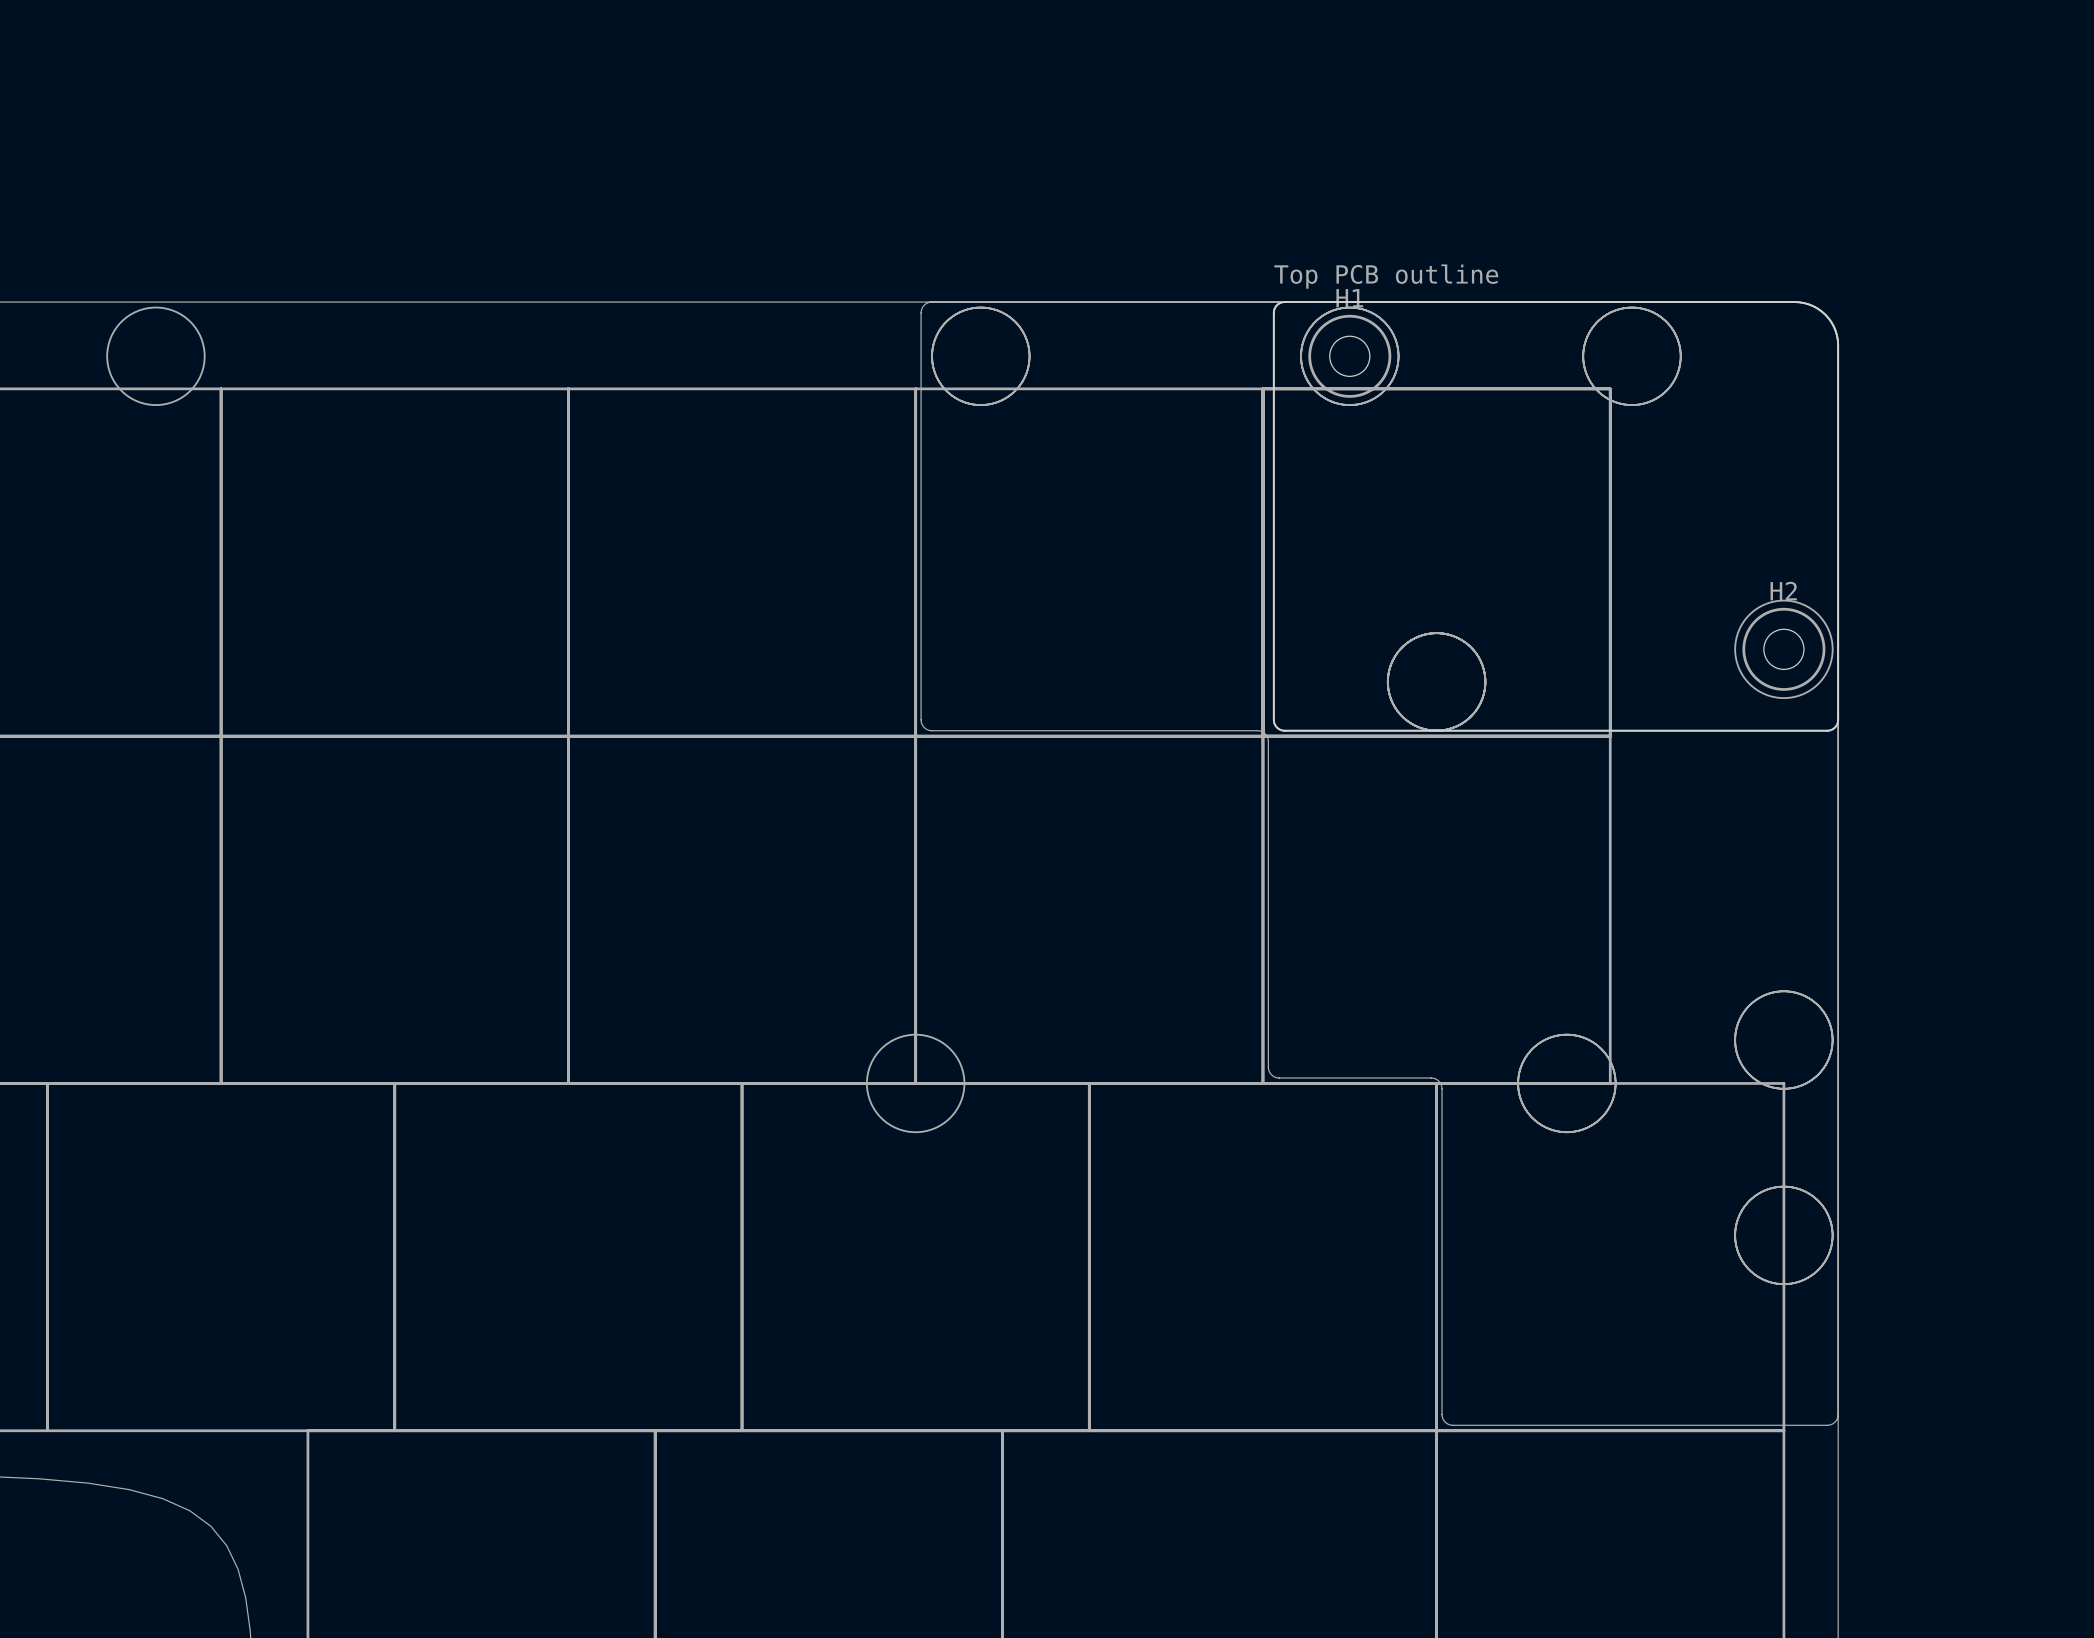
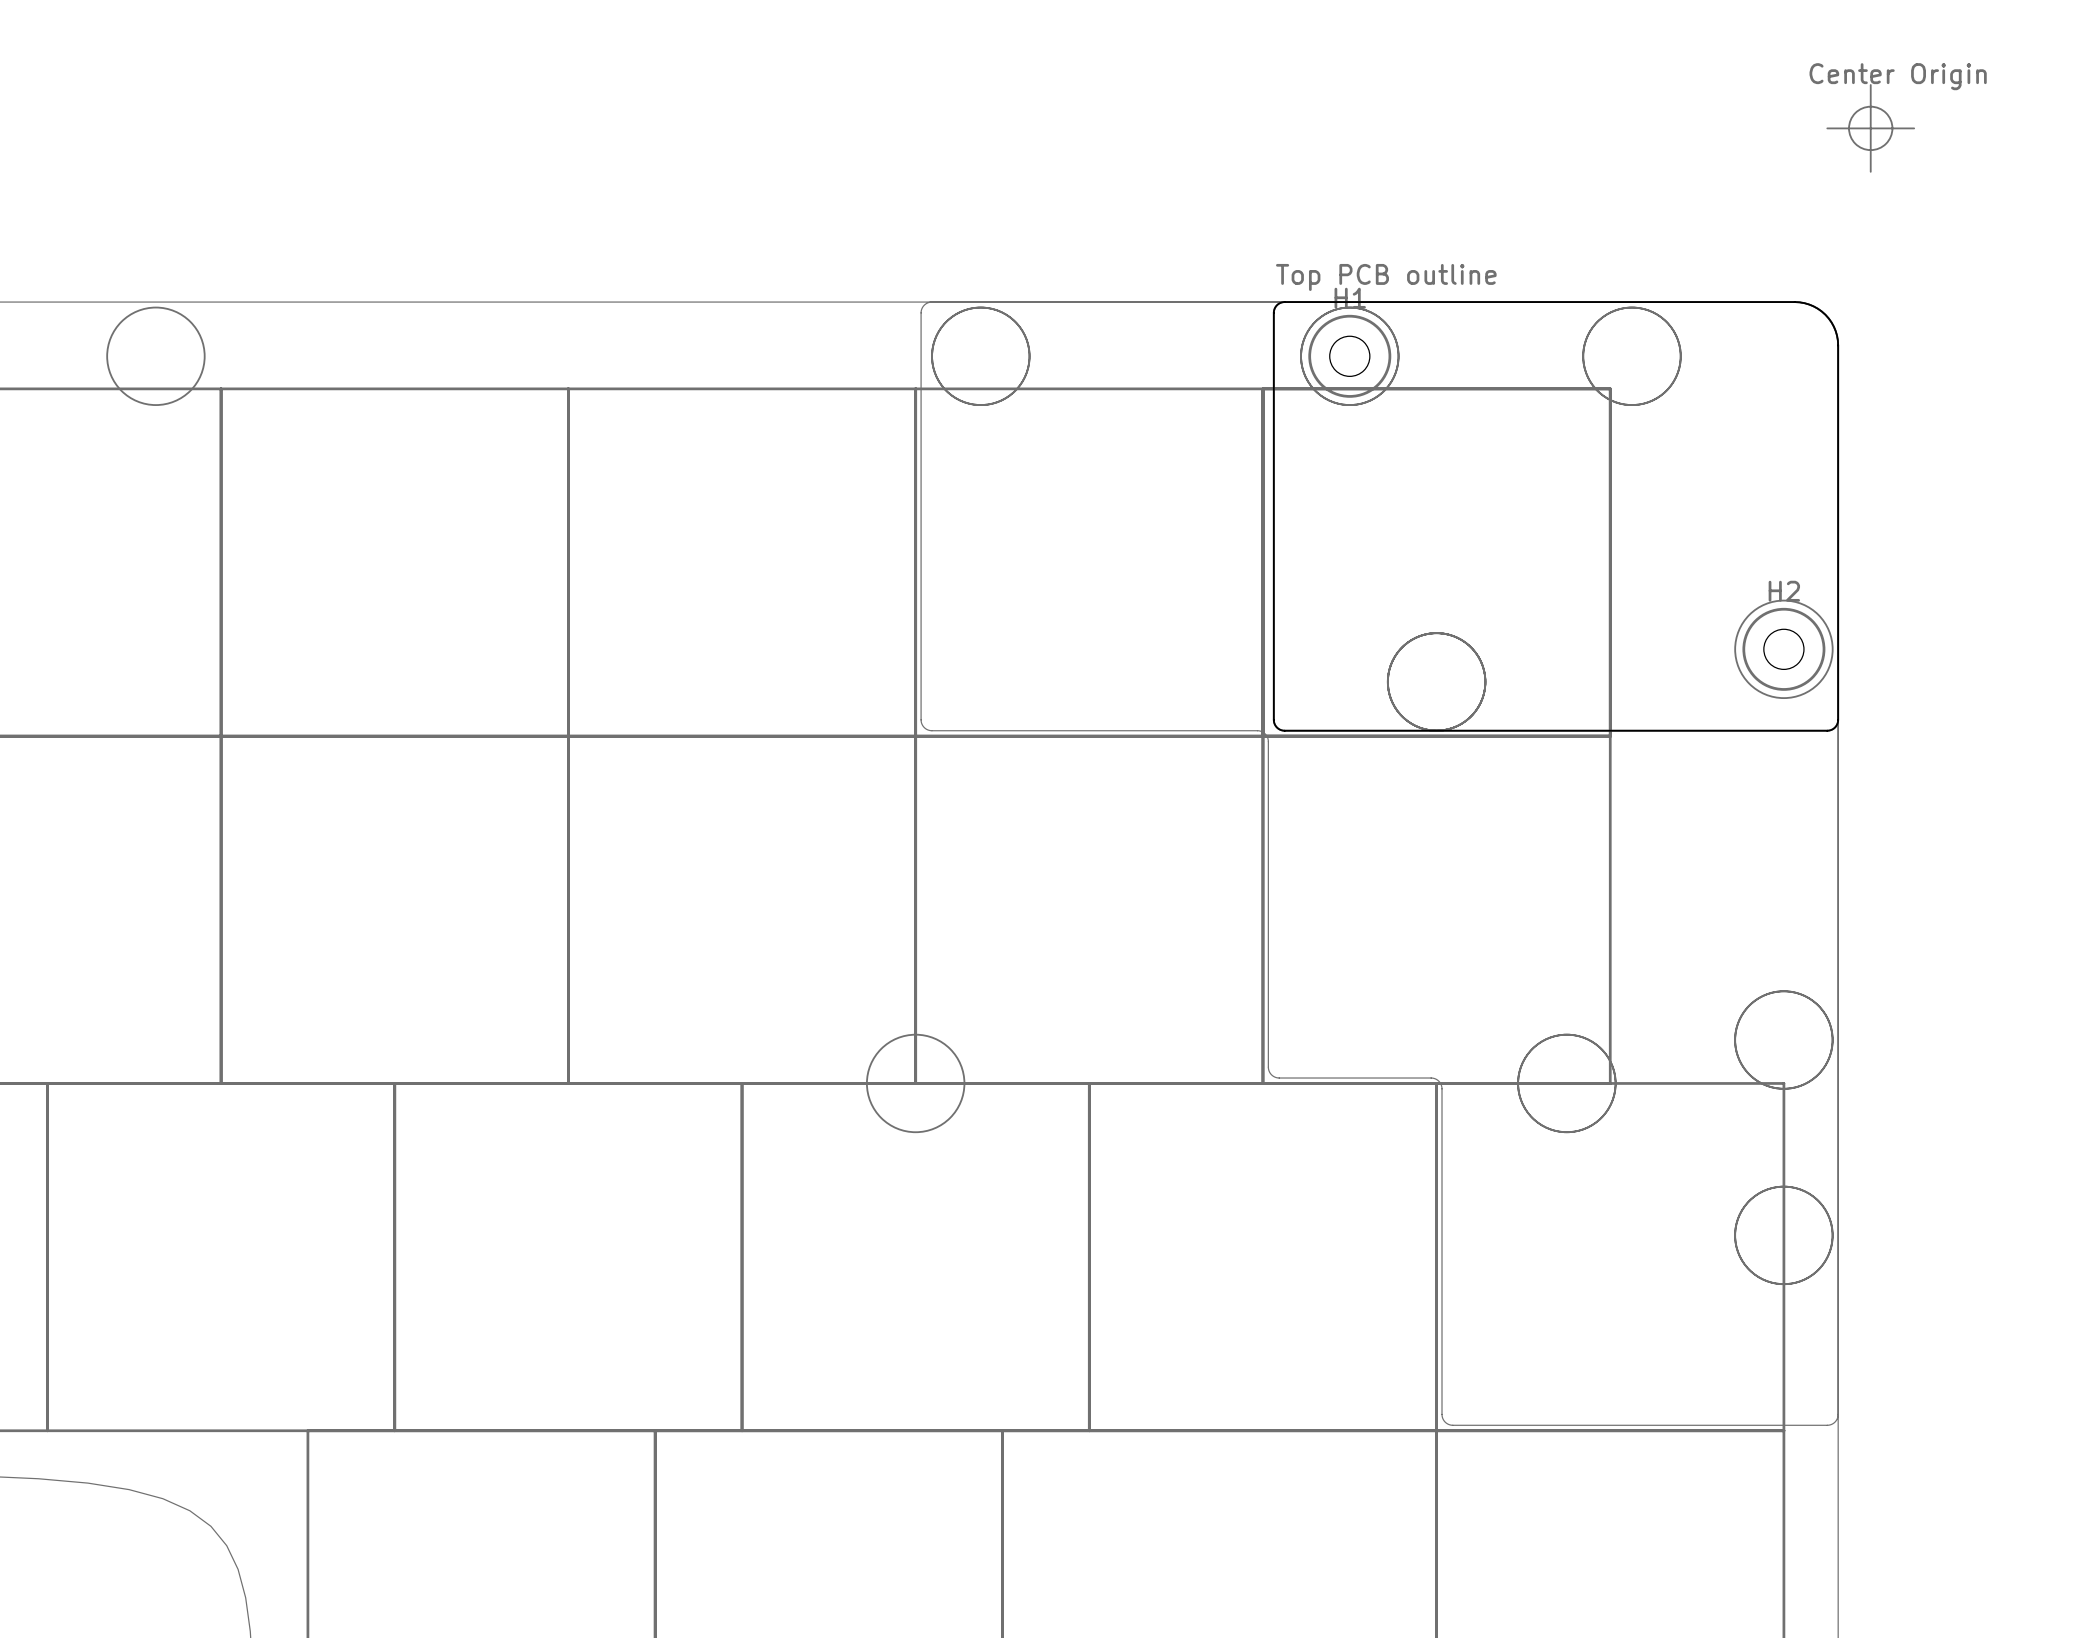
text: none -> Center Origin (1898, 76)
line: none -> (1870, 84) (1870, 171)
drawing: none -> [1848, 105, 1894, 152]
line: none -> (1827, 128) (1914, 128)

